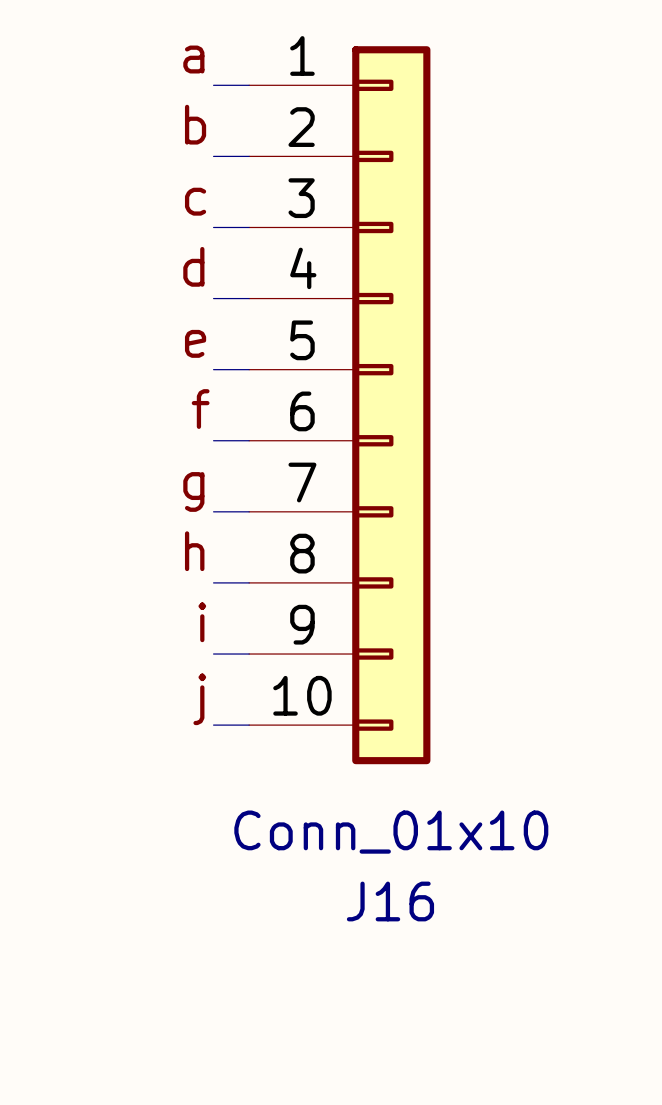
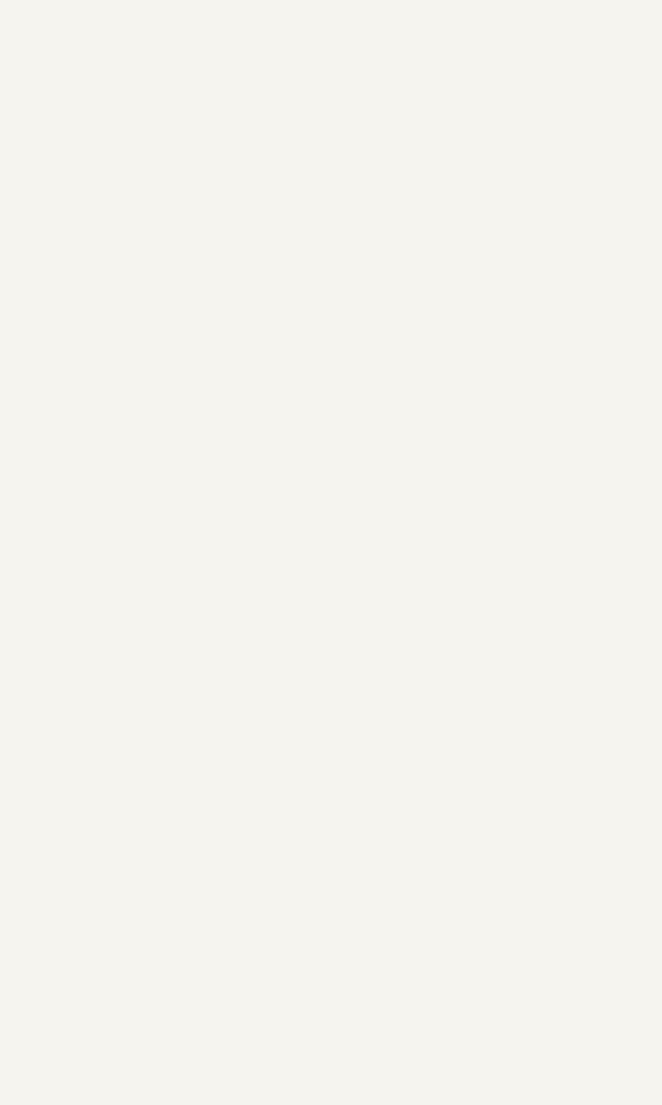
label: a (193, 59) -> none
wire: (213, 85) (249, 85) -> none
label: b (195, 124) -> none
wire: (213, 156) (249, 156) -> none
label: c (195, 201) -> none
wire: (213, 227) (249, 227) -> none
label: d (193, 266) -> none
wire: (213, 298) (249, 298) -> none
label: e (195, 343) -> none
wire: (213, 369) (249, 369) -> none
J16: Conn_01x10 (339, 405) -> none
label: f (200, 409) -> none
wire: (213, 440) (249, 440) -> none
label: g (193, 491) -> none
wire: (213, 511) (249, 511) -> none
label: h (194, 551) -> none
wire: (213, 582) (249, 582) -> none
label: i (202, 622) -> none
wire: (213, 654) (249, 654) -> none
label: j (199, 699) -> none
wire: (213, 725) (249, 725) -> none

